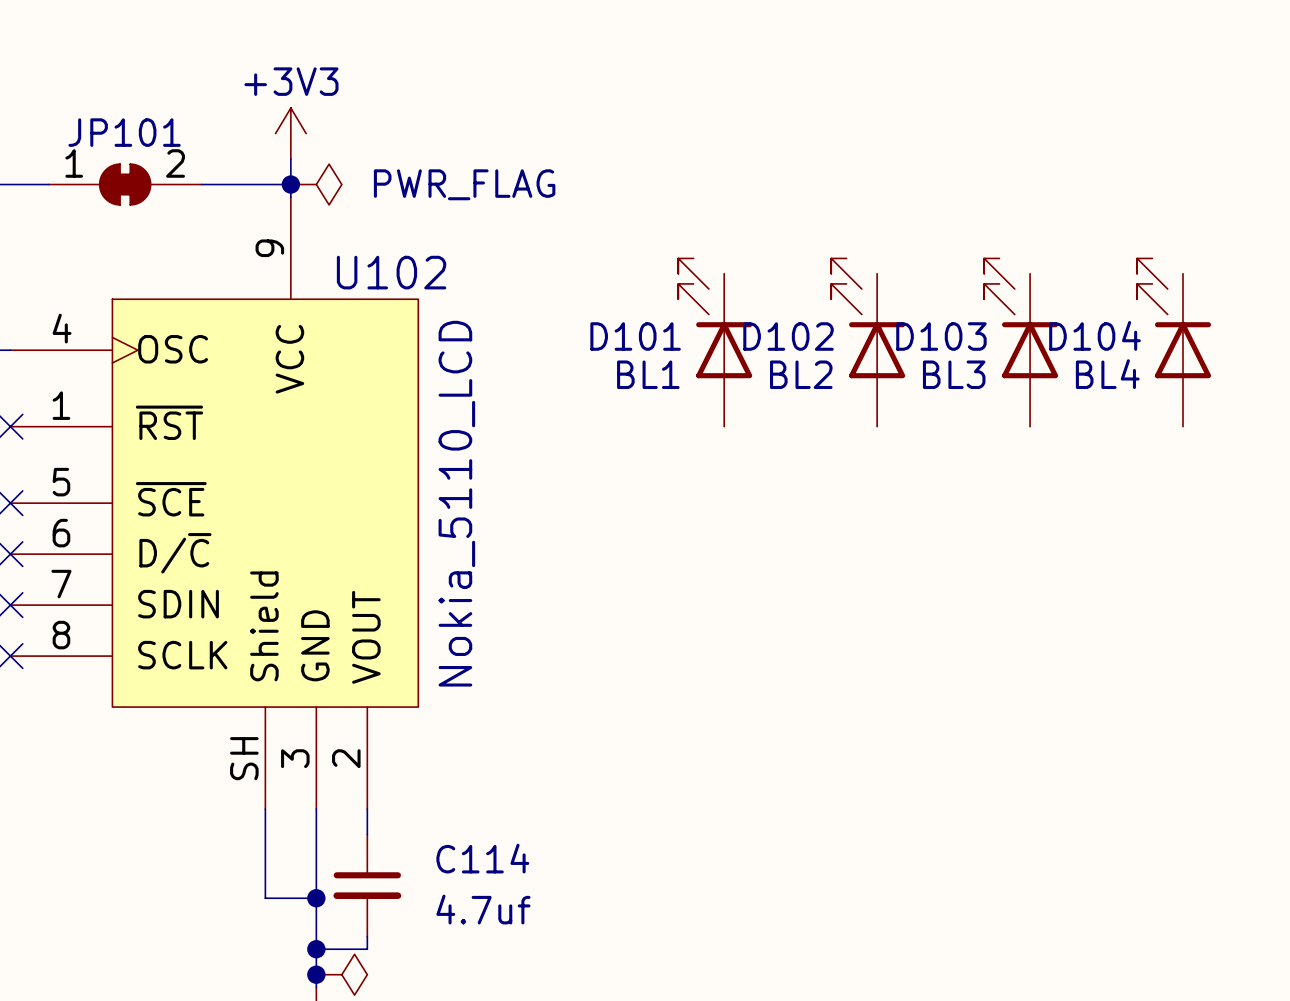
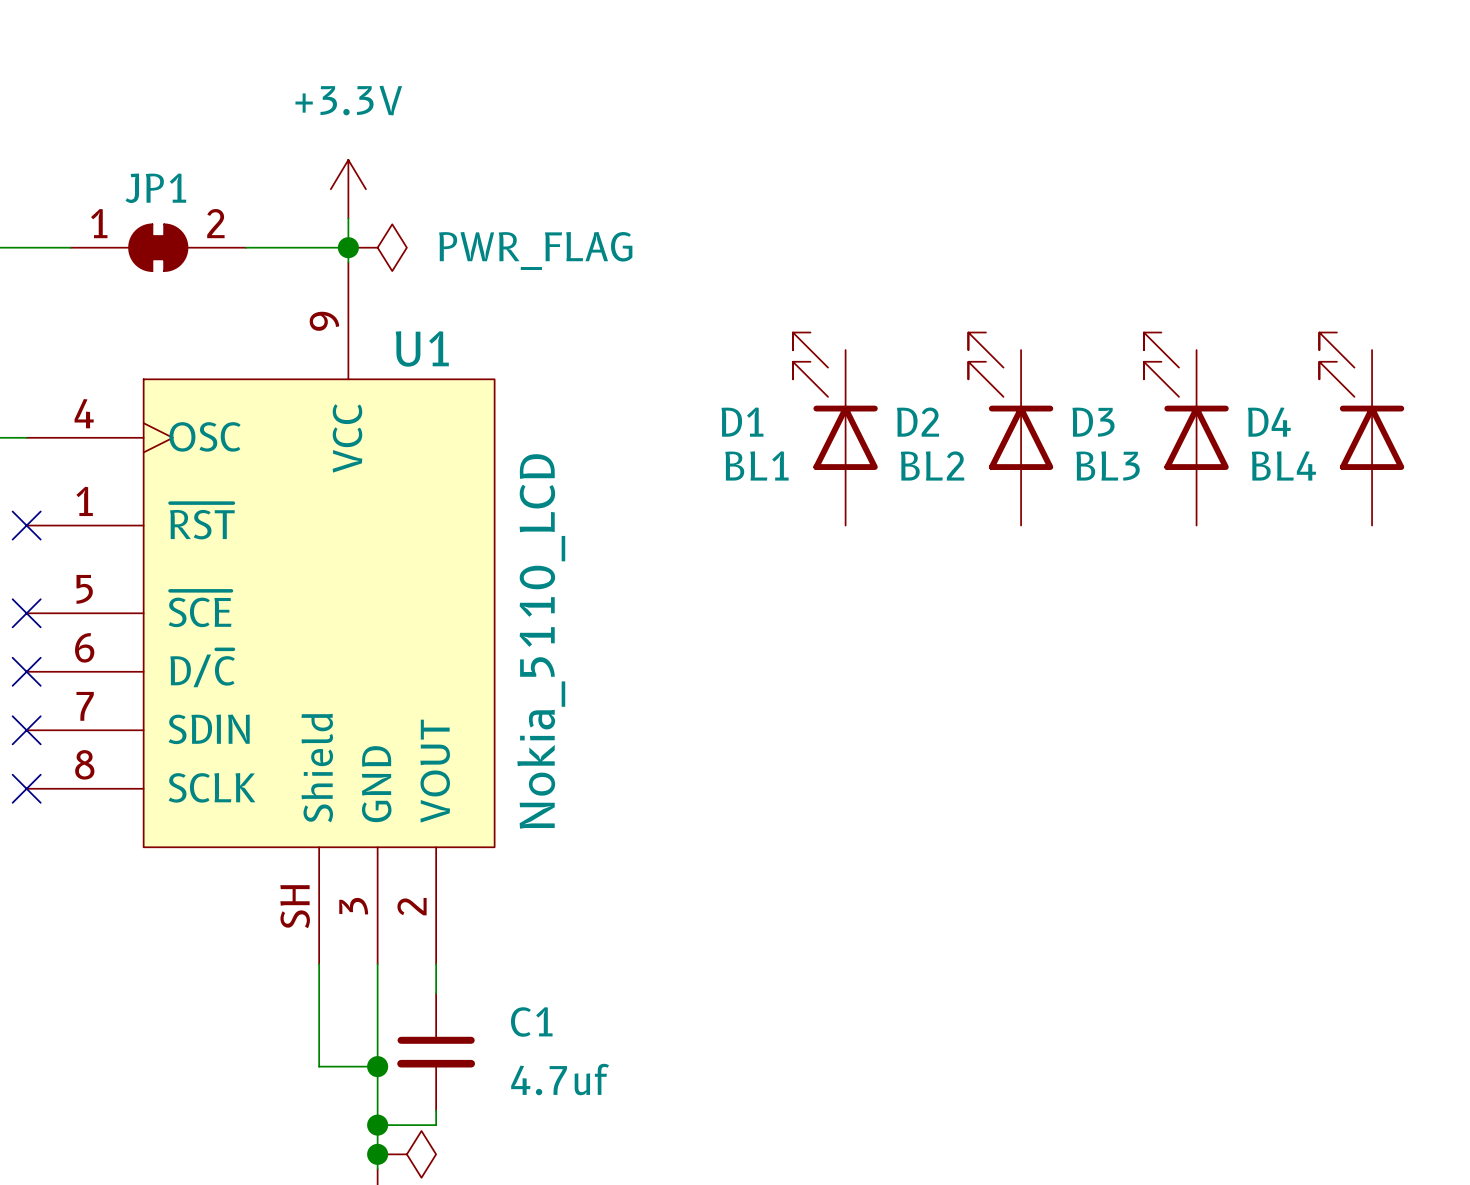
JP101 name: JP101 (124, 132) -> JP1 (155, 188)
power symbol: +3V3 (290, 133) -> +3.3V (348, 189)
U102 name: U102 (391, 272) -> U1 (422, 348)
D104 name: D104 (1095, 335) -> D4 (1269, 422)
D101 name: D101 (635, 336) -> D1 (742, 422)
D102 name: D102 (788, 336) -> D2 (917, 422)
D103 name: D103 (941, 336) -> D3 (1093, 422)
C114 name: C114 (482, 858) -> C1 (531, 1021)

